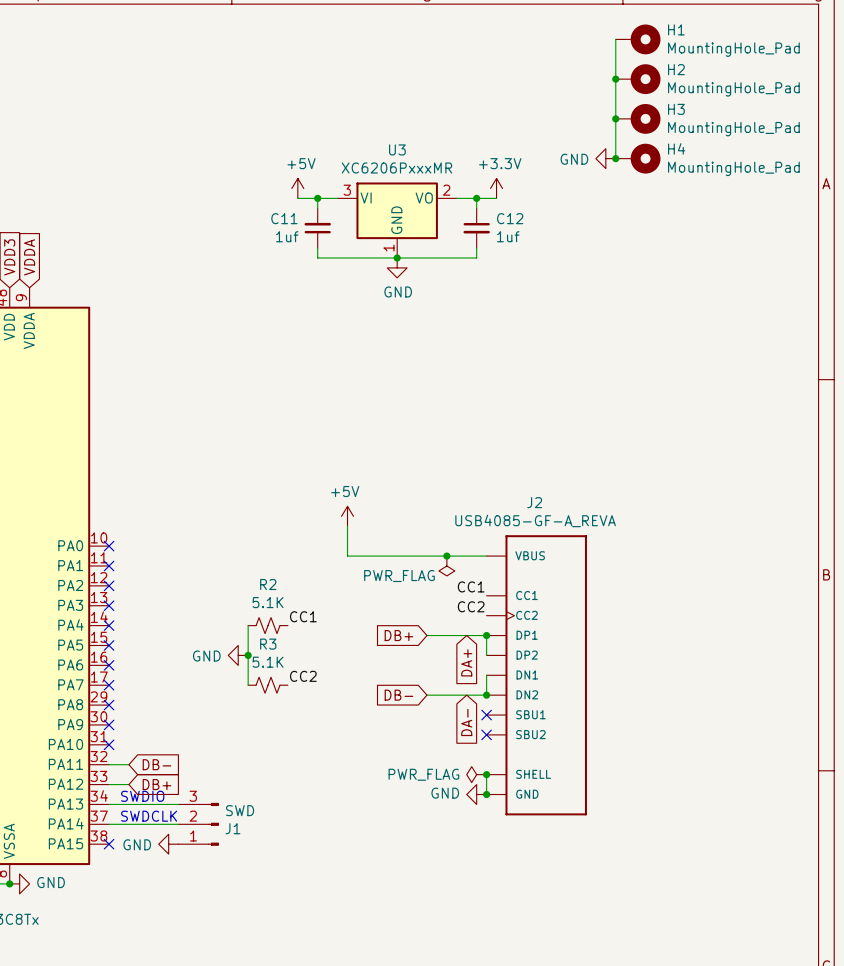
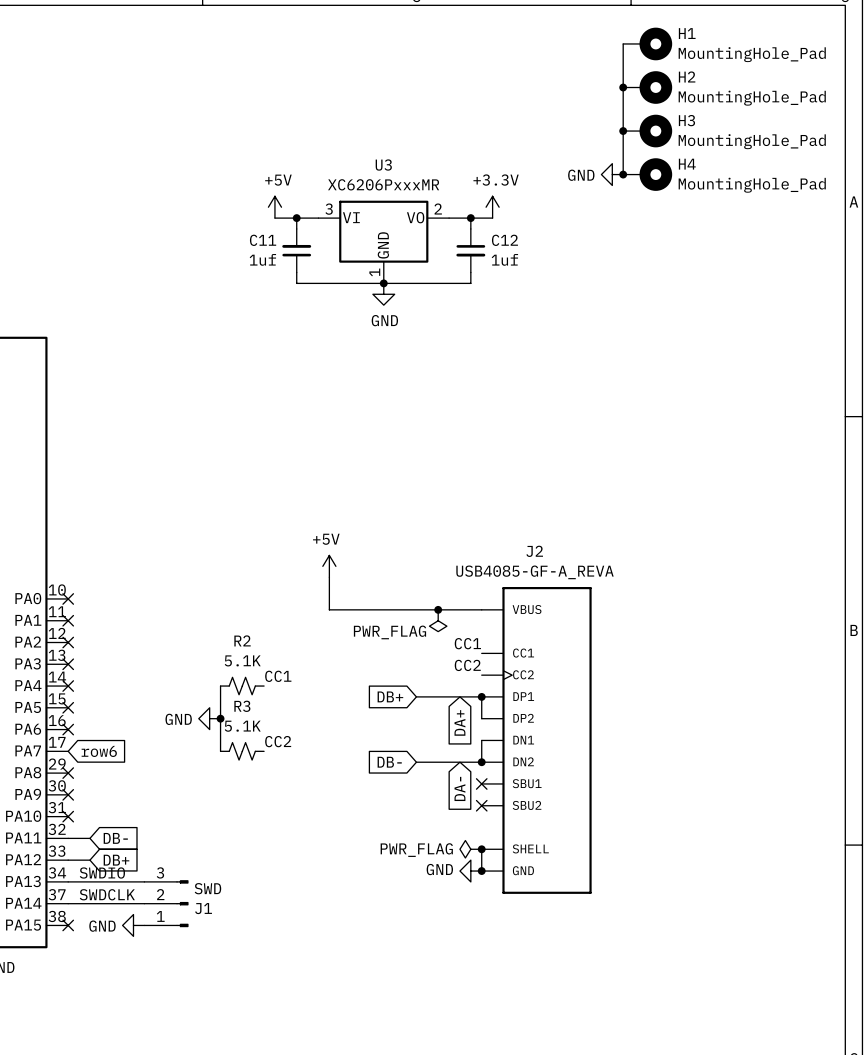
no-connect mark: (109, 685) -> none
global label: none -> row6 (99, 751)

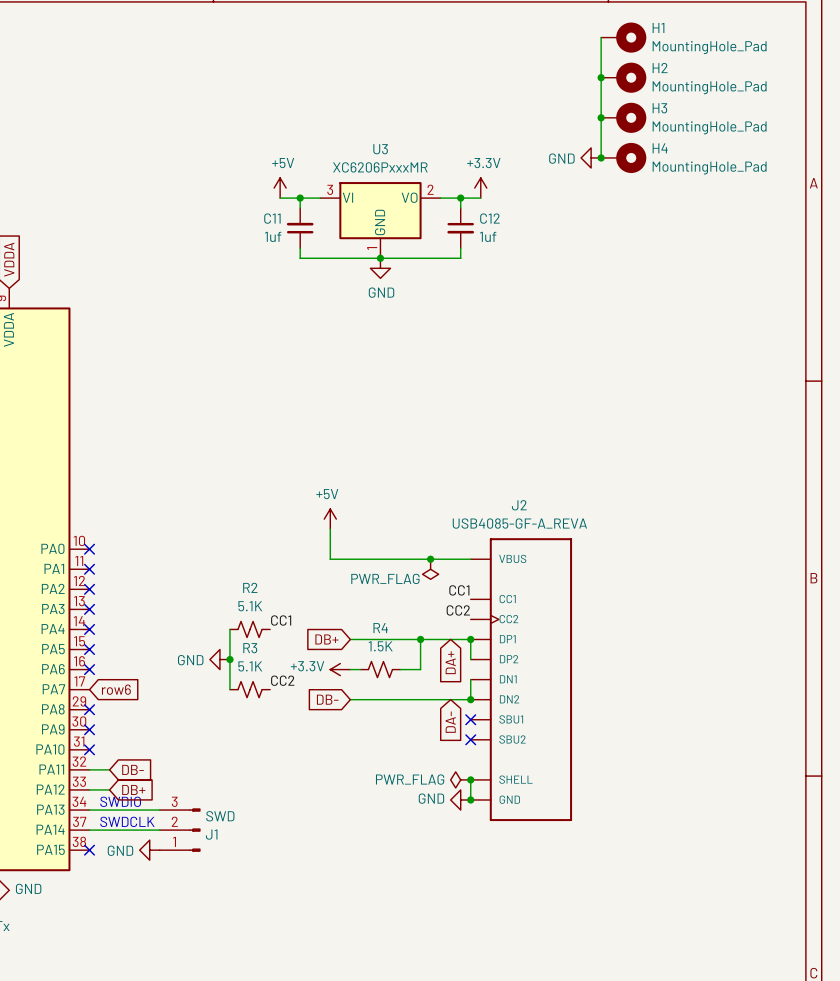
wire: none -> (350, 639) (410, 639)
global label position: DB+ (390, 696) -> DB+ (326, 639)
wire: none -> (420, 639) (420, 669) (400, 669)
junction: none -> (420, 639)
power symbol: none -> +3.3V (340, 669)
wire: none -> (350, 669) (360, 669)
R4: none -> 1.5K (380, 669)
wire: none -> (350, 699) (410, 699)
global label position: DB- (389, 762) -> DB- (327, 699)

